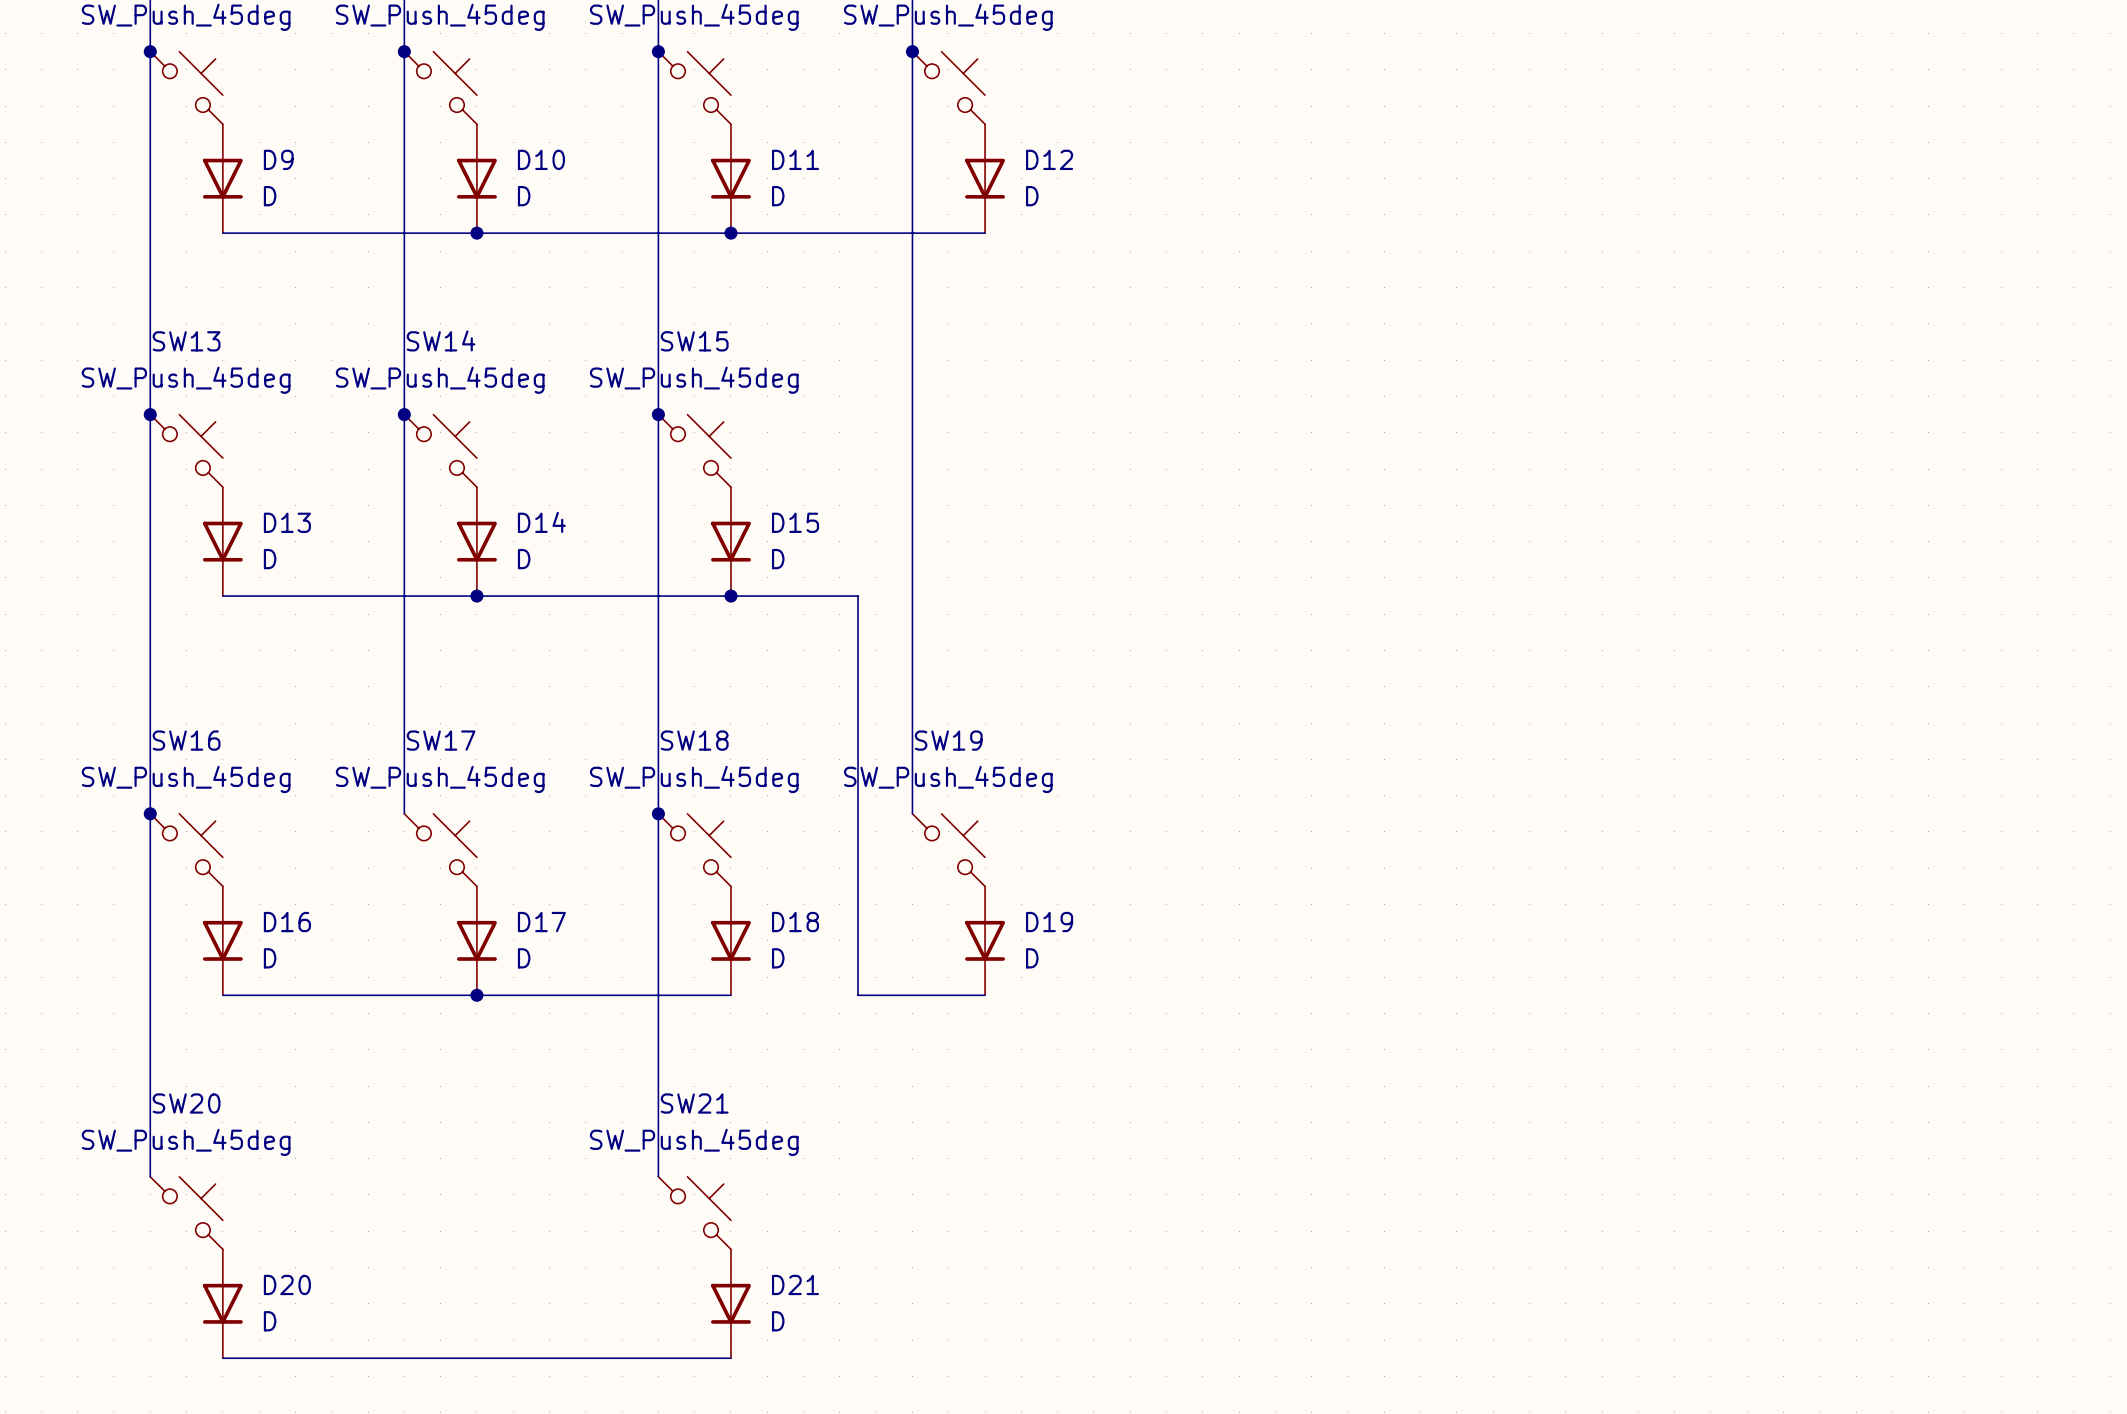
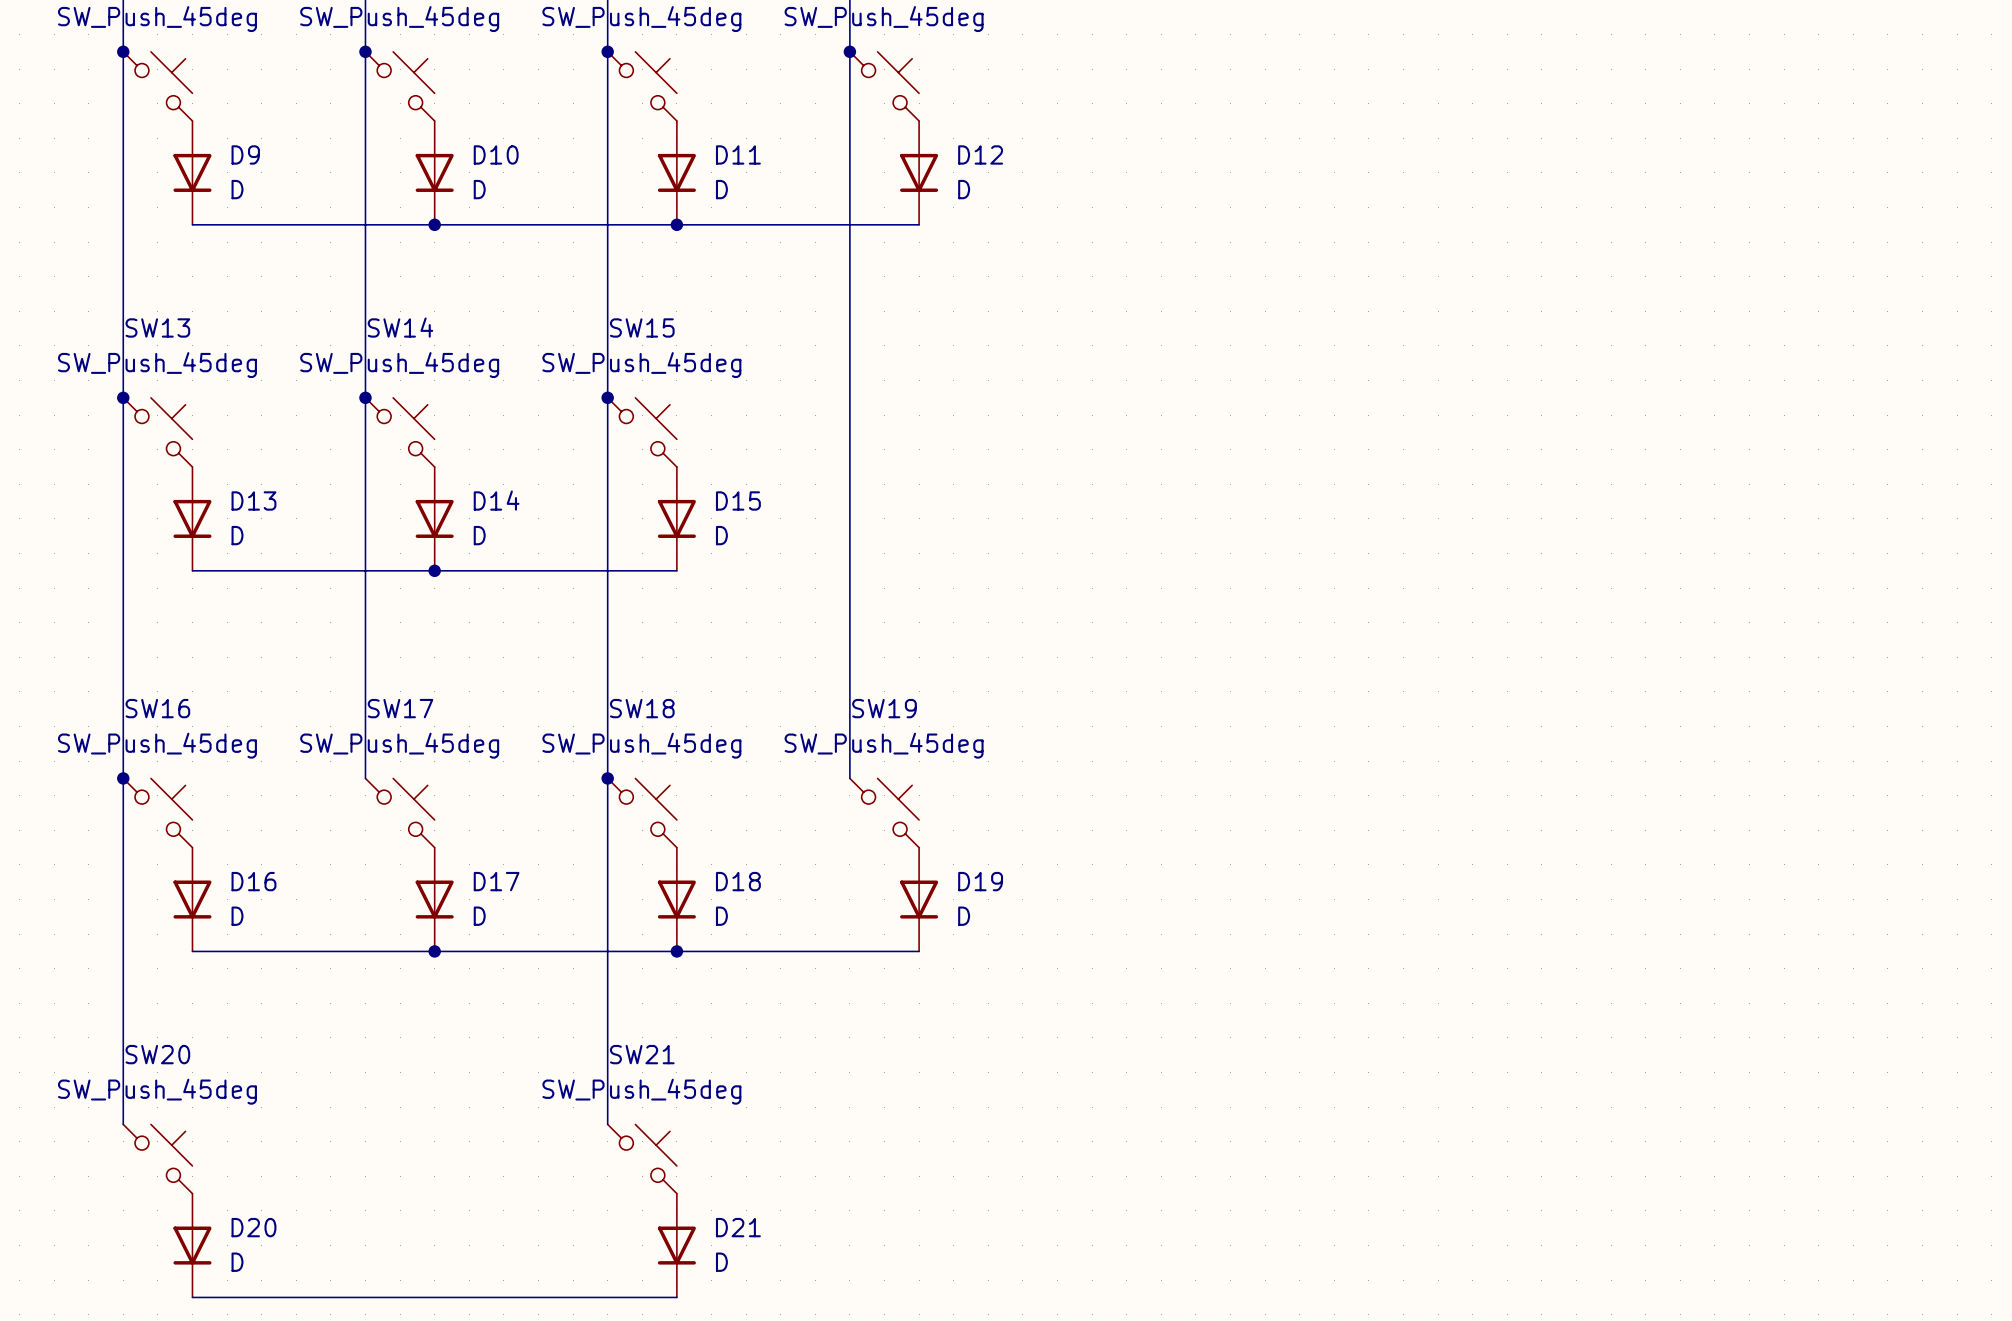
wire: (730, 596) (858, 596) (858, 995) -> (676, 951) (797, 951)
junction: (730, 596) -> none
junction: none -> (676, 951)

